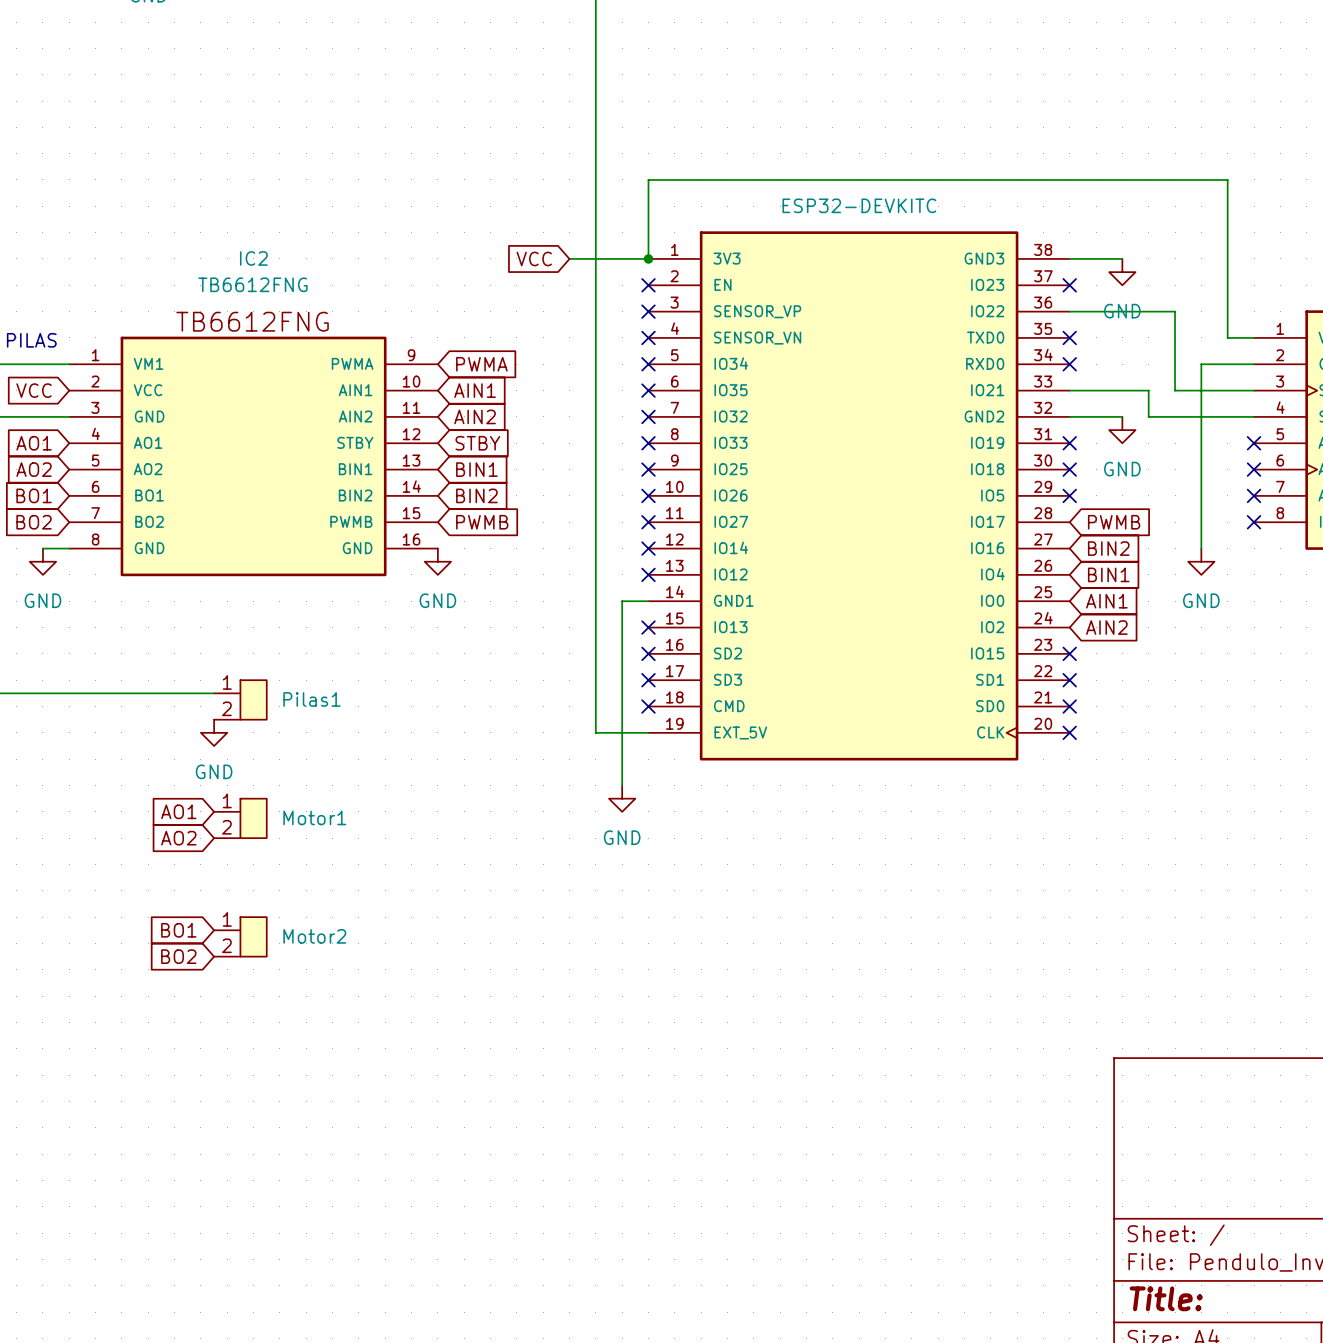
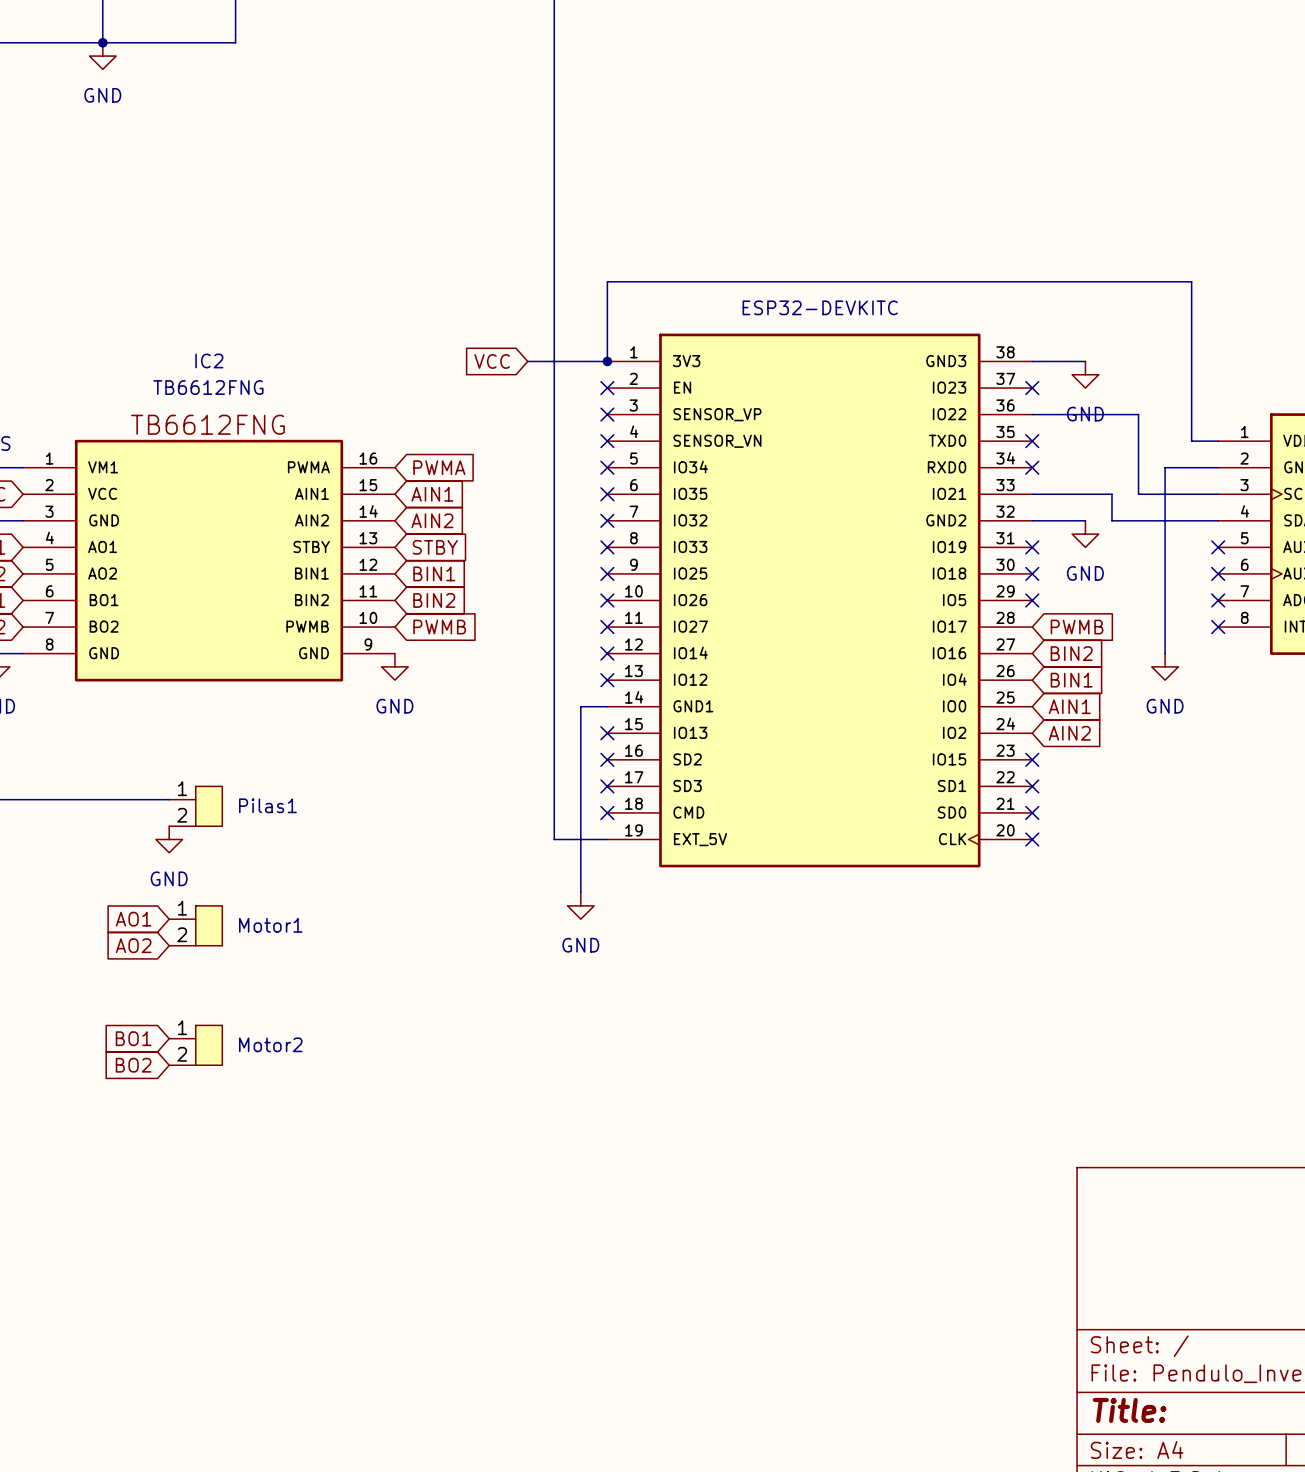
IC2 pin number: 9 (411, 355) -> 16 (368, 458)
IC2 pin number: 10 (411, 381) -> 15 (368, 485)
IC2 pin number: 11 (411, 407) -> 14 (368, 511)
IC2 pin number: 12 (411, 434) -> 13 (368, 538)
IC2 pin number: 13 (411, 460) -> 12 (368, 564)
IC2 pin number: 14 (411, 486) -> 11 (368, 591)
IC2 pin number: 15 (411, 513) -> 10 (368, 617)
IC2 pin number: 16 (411, 539) -> 9 (368, 644)

